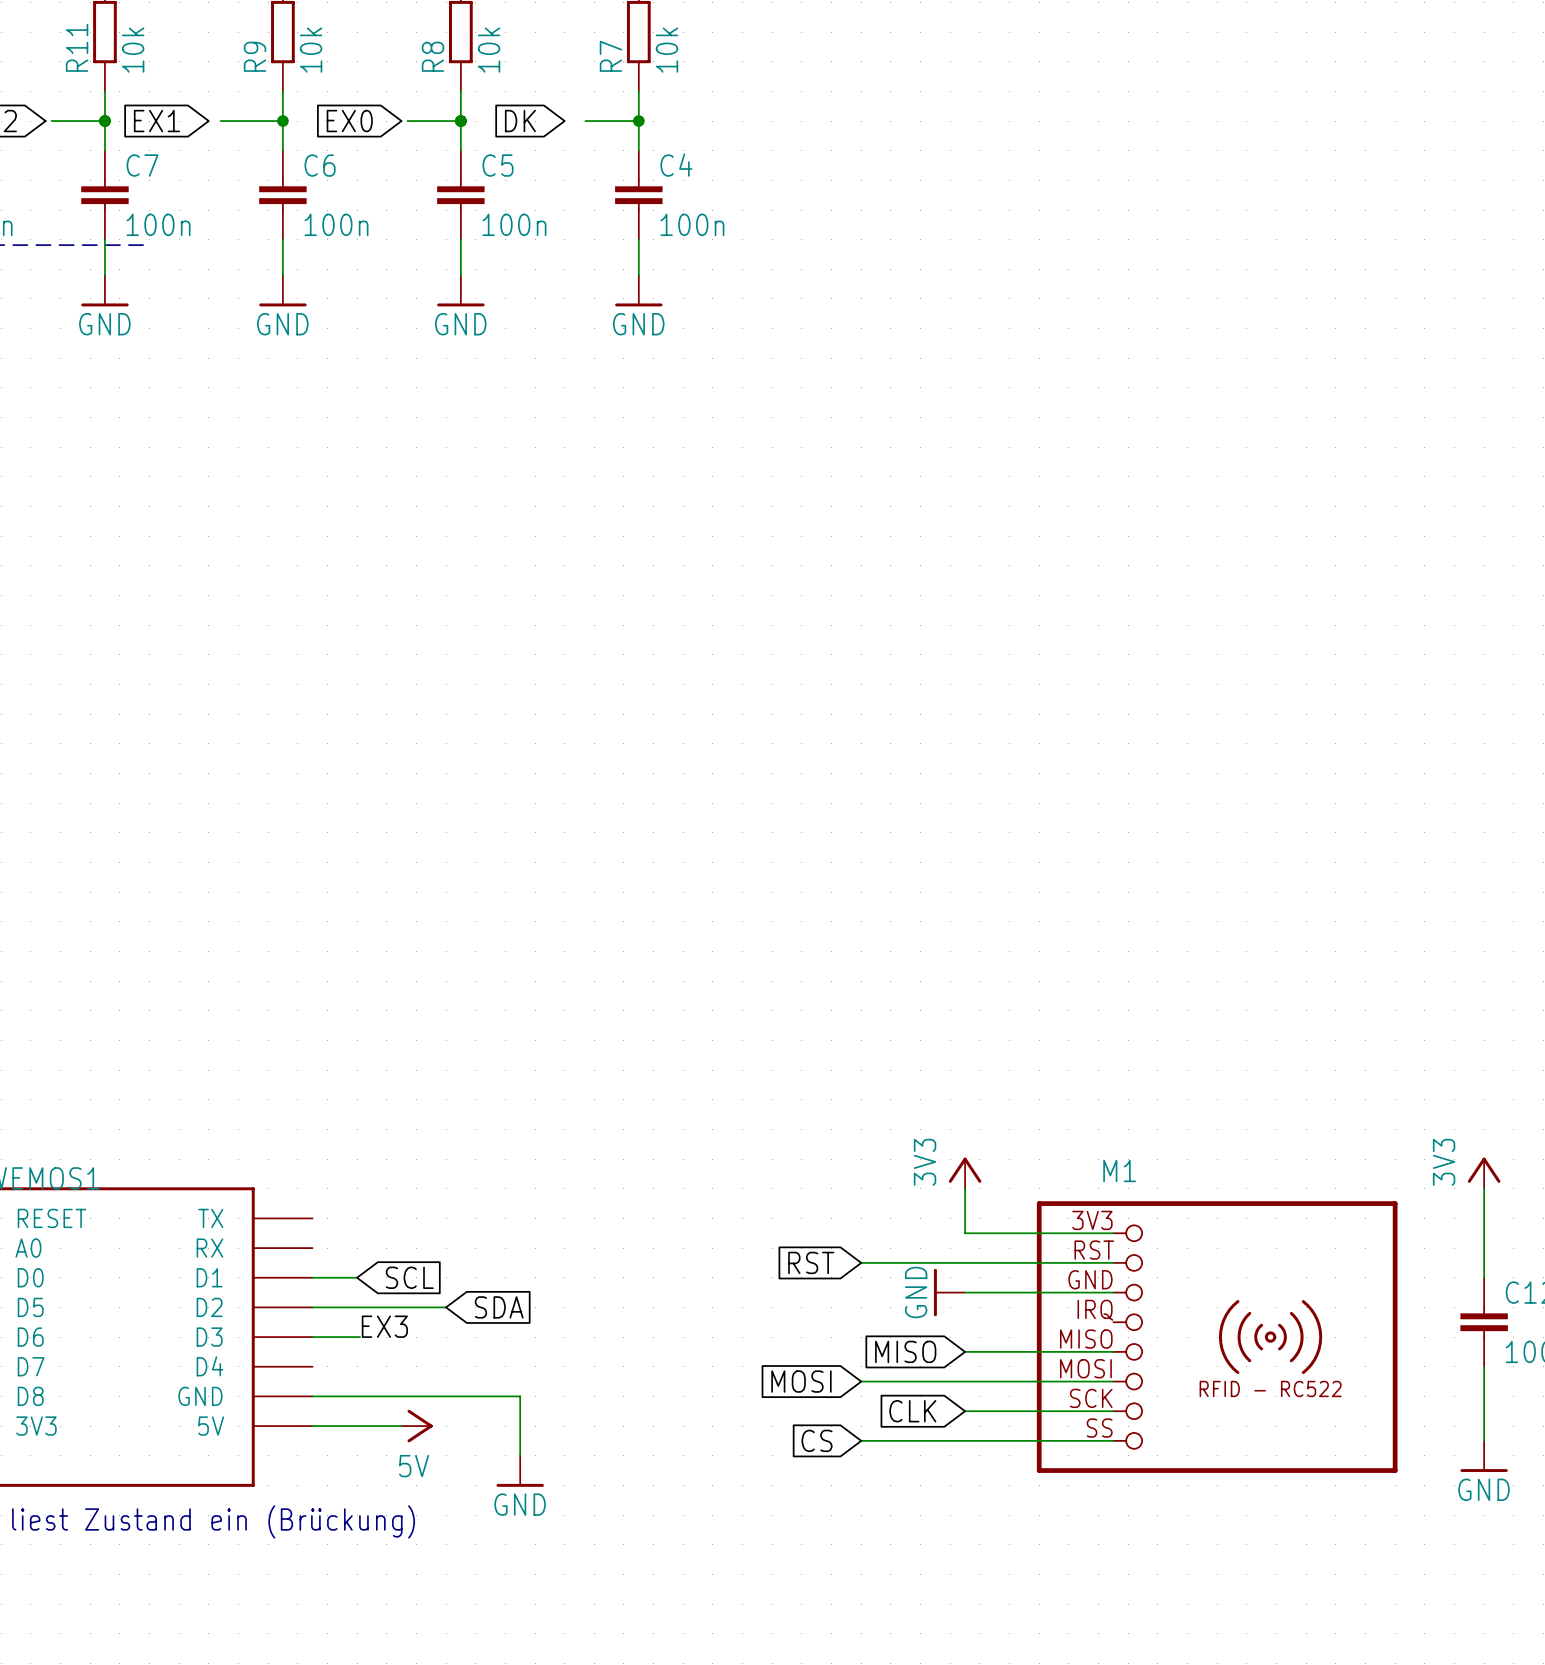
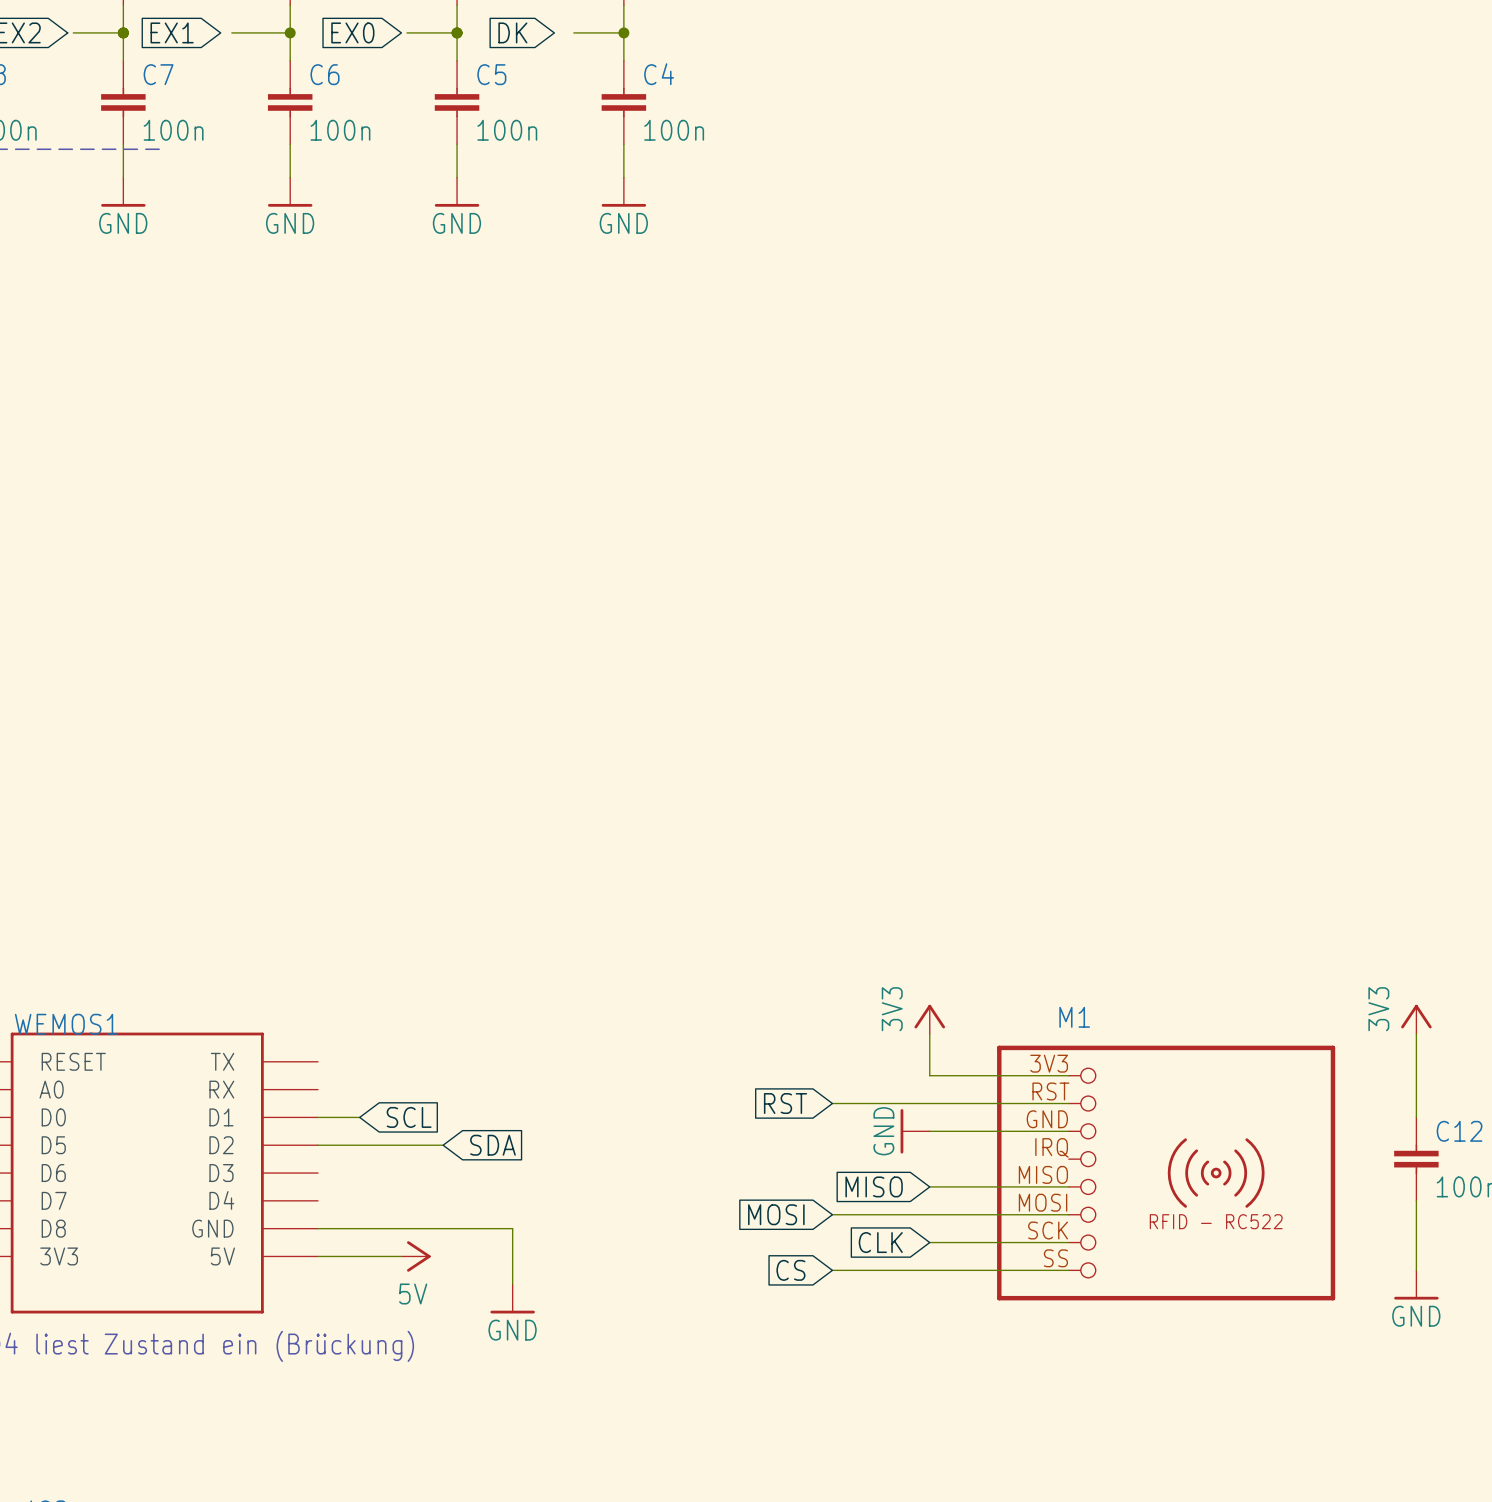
label: EX3 (384, 1326) -> none
wire: (312, 1337) (360, 1337) -> none

